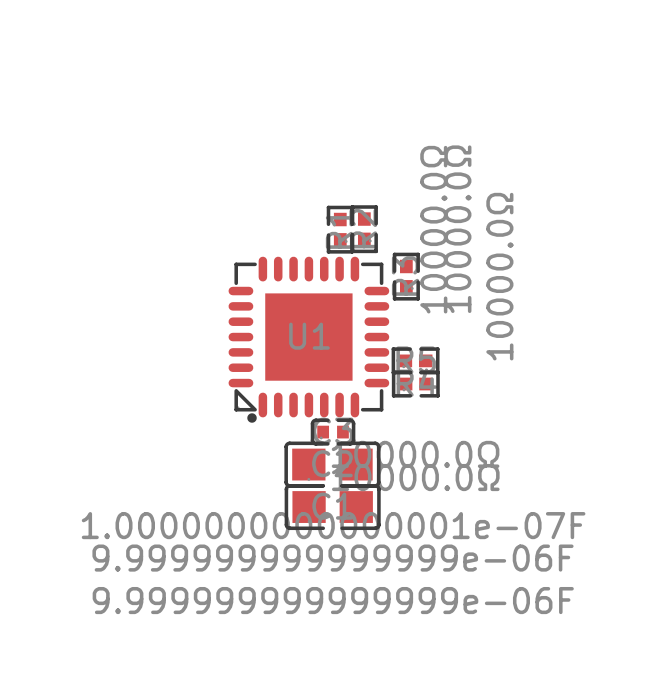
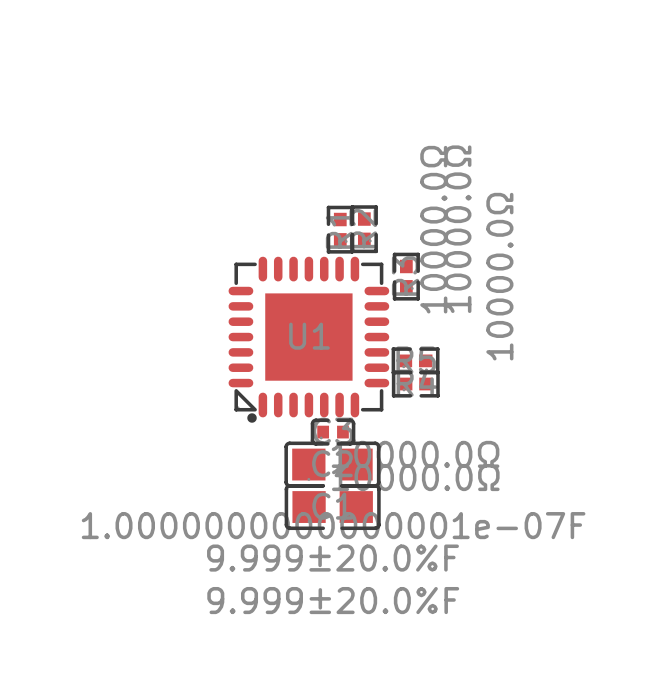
part value: 9.999999999999999e-06F (332, 558) -> 9.999±20.0%F (332, 558)
part value: 9.999999999999999e-06F (333, 600) -> 9.999±20.0%F (333, 600)

